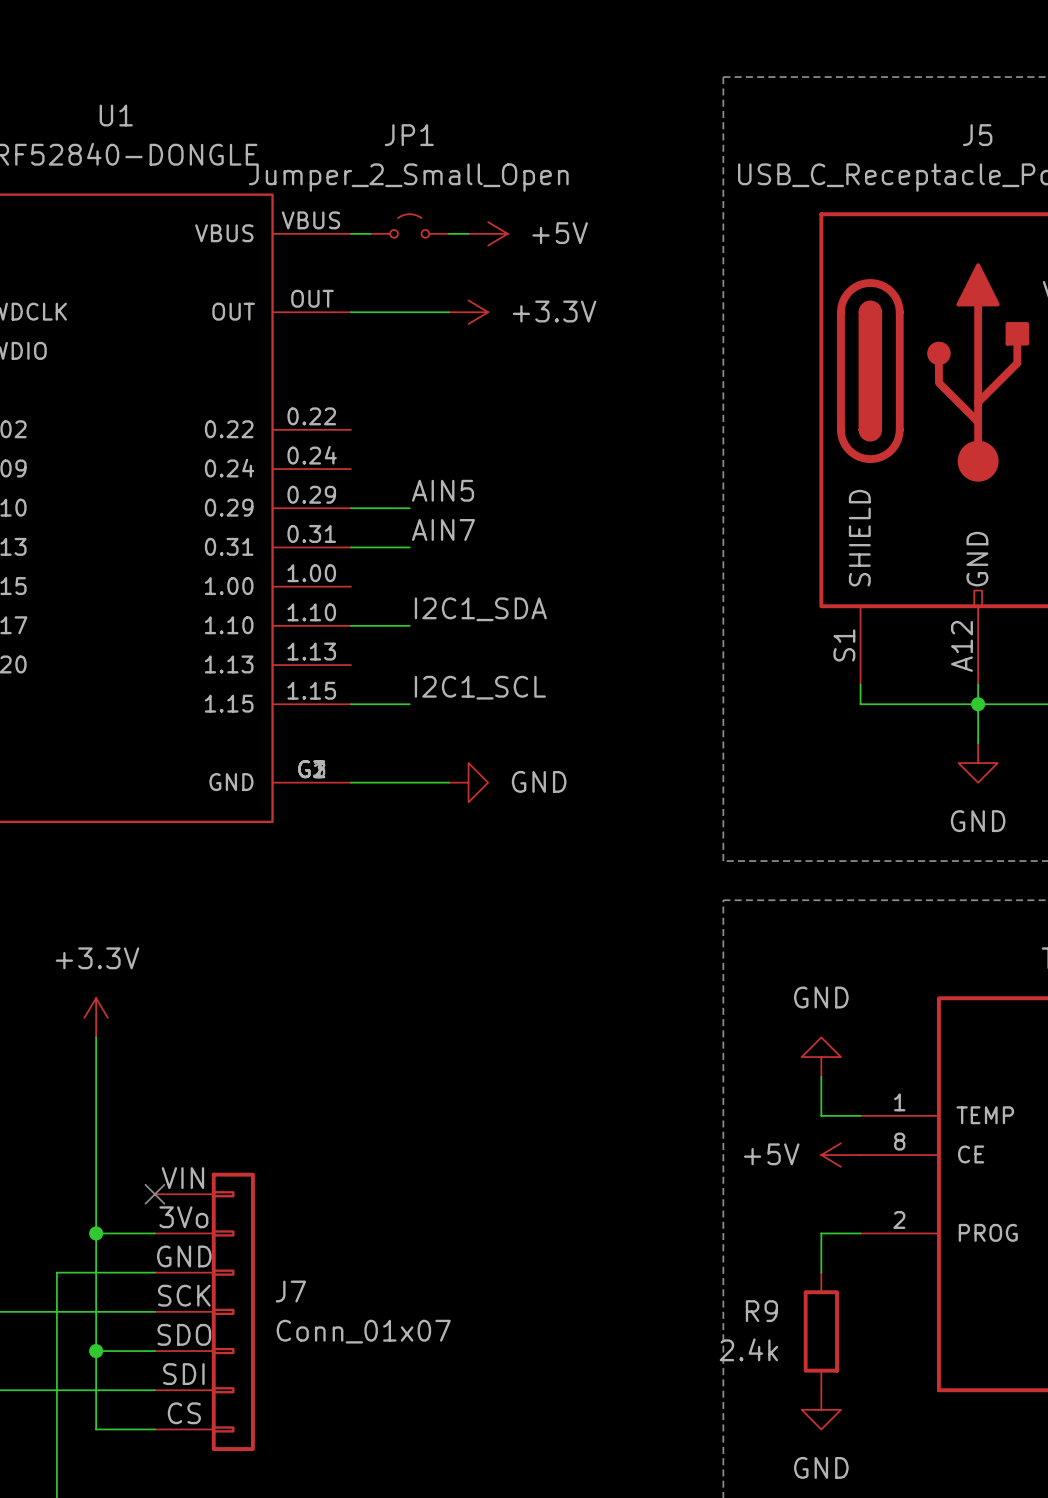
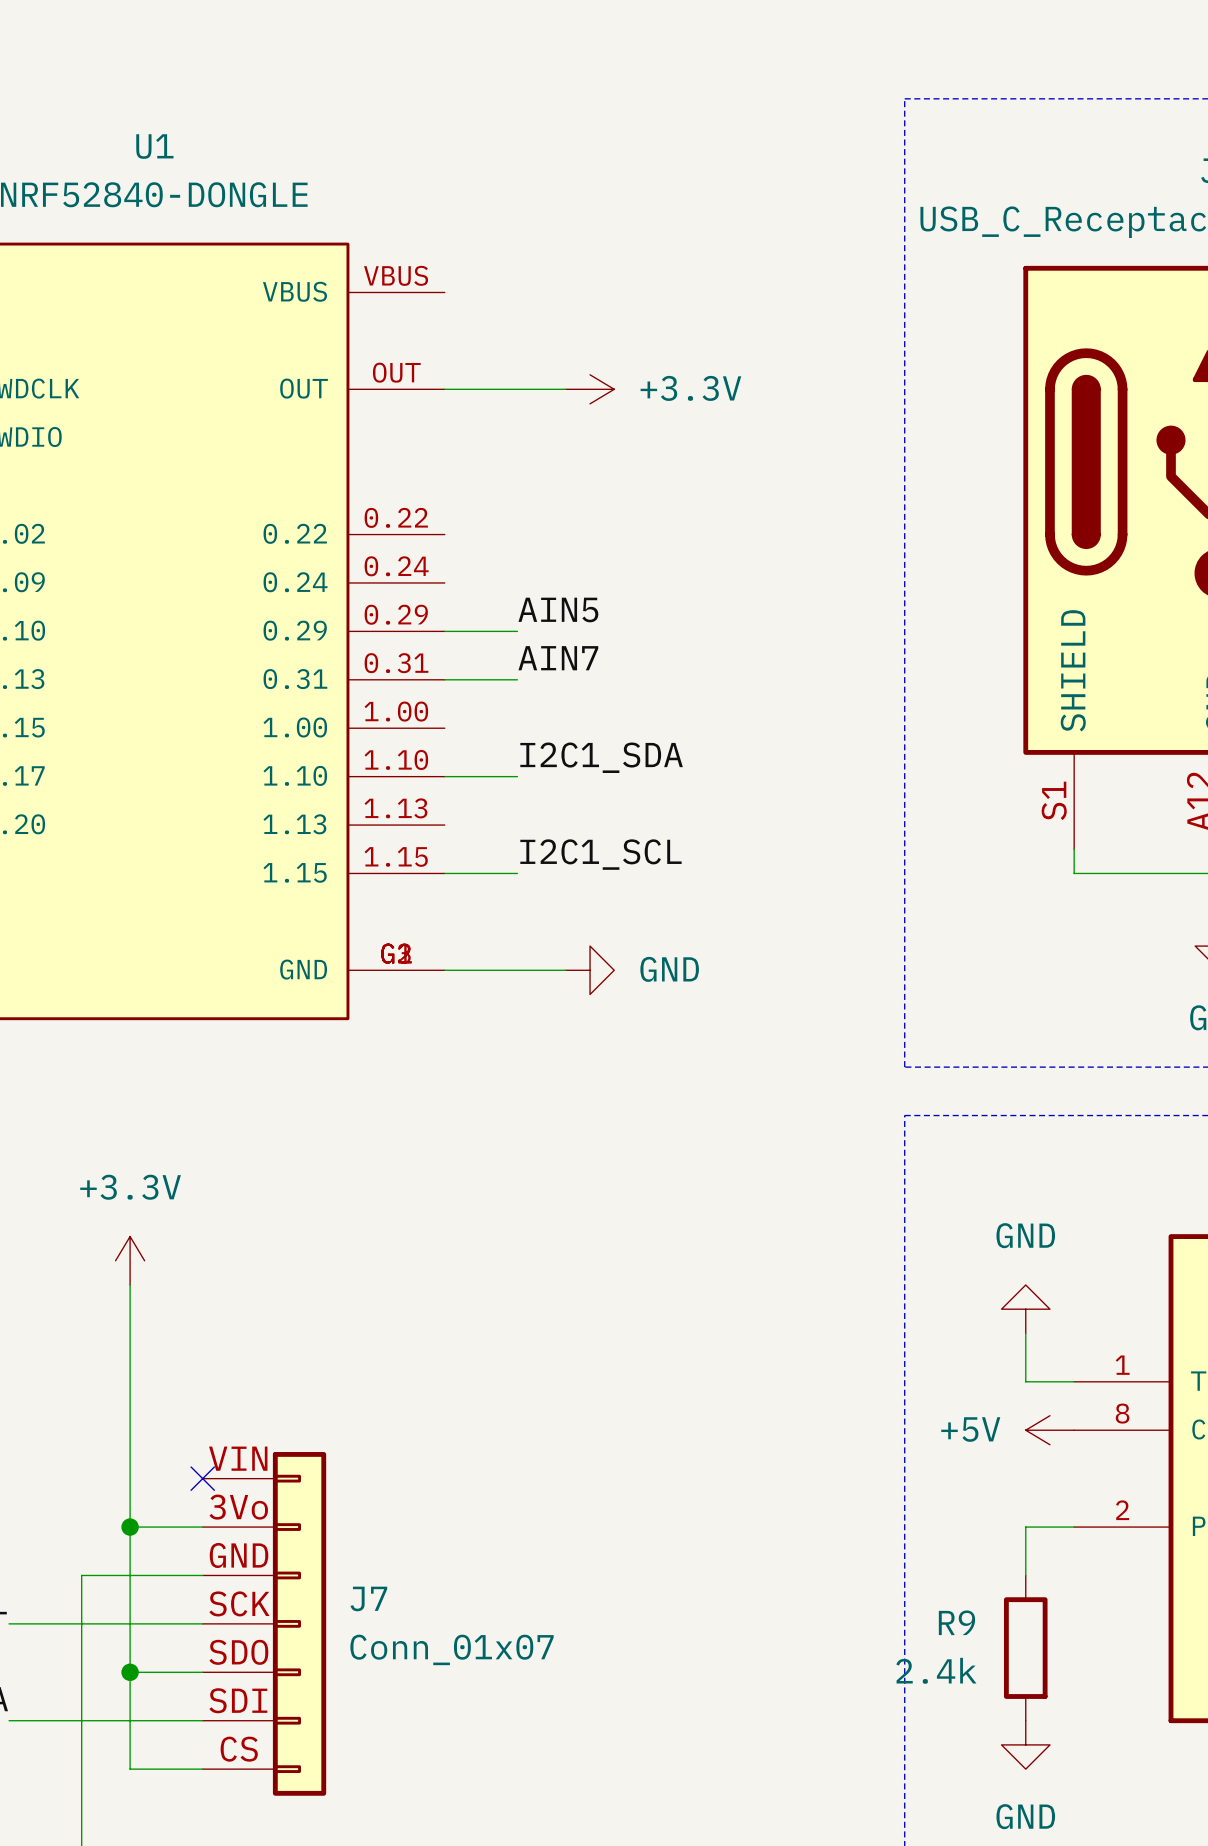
JP1: Jumper_2_Small_Open (409, 225) -> none
wire: (350, 233) (370, 233) -> none
wire: (448, 233) (468, 233) -> none
power symbol: +5V (488, 233) -> none

